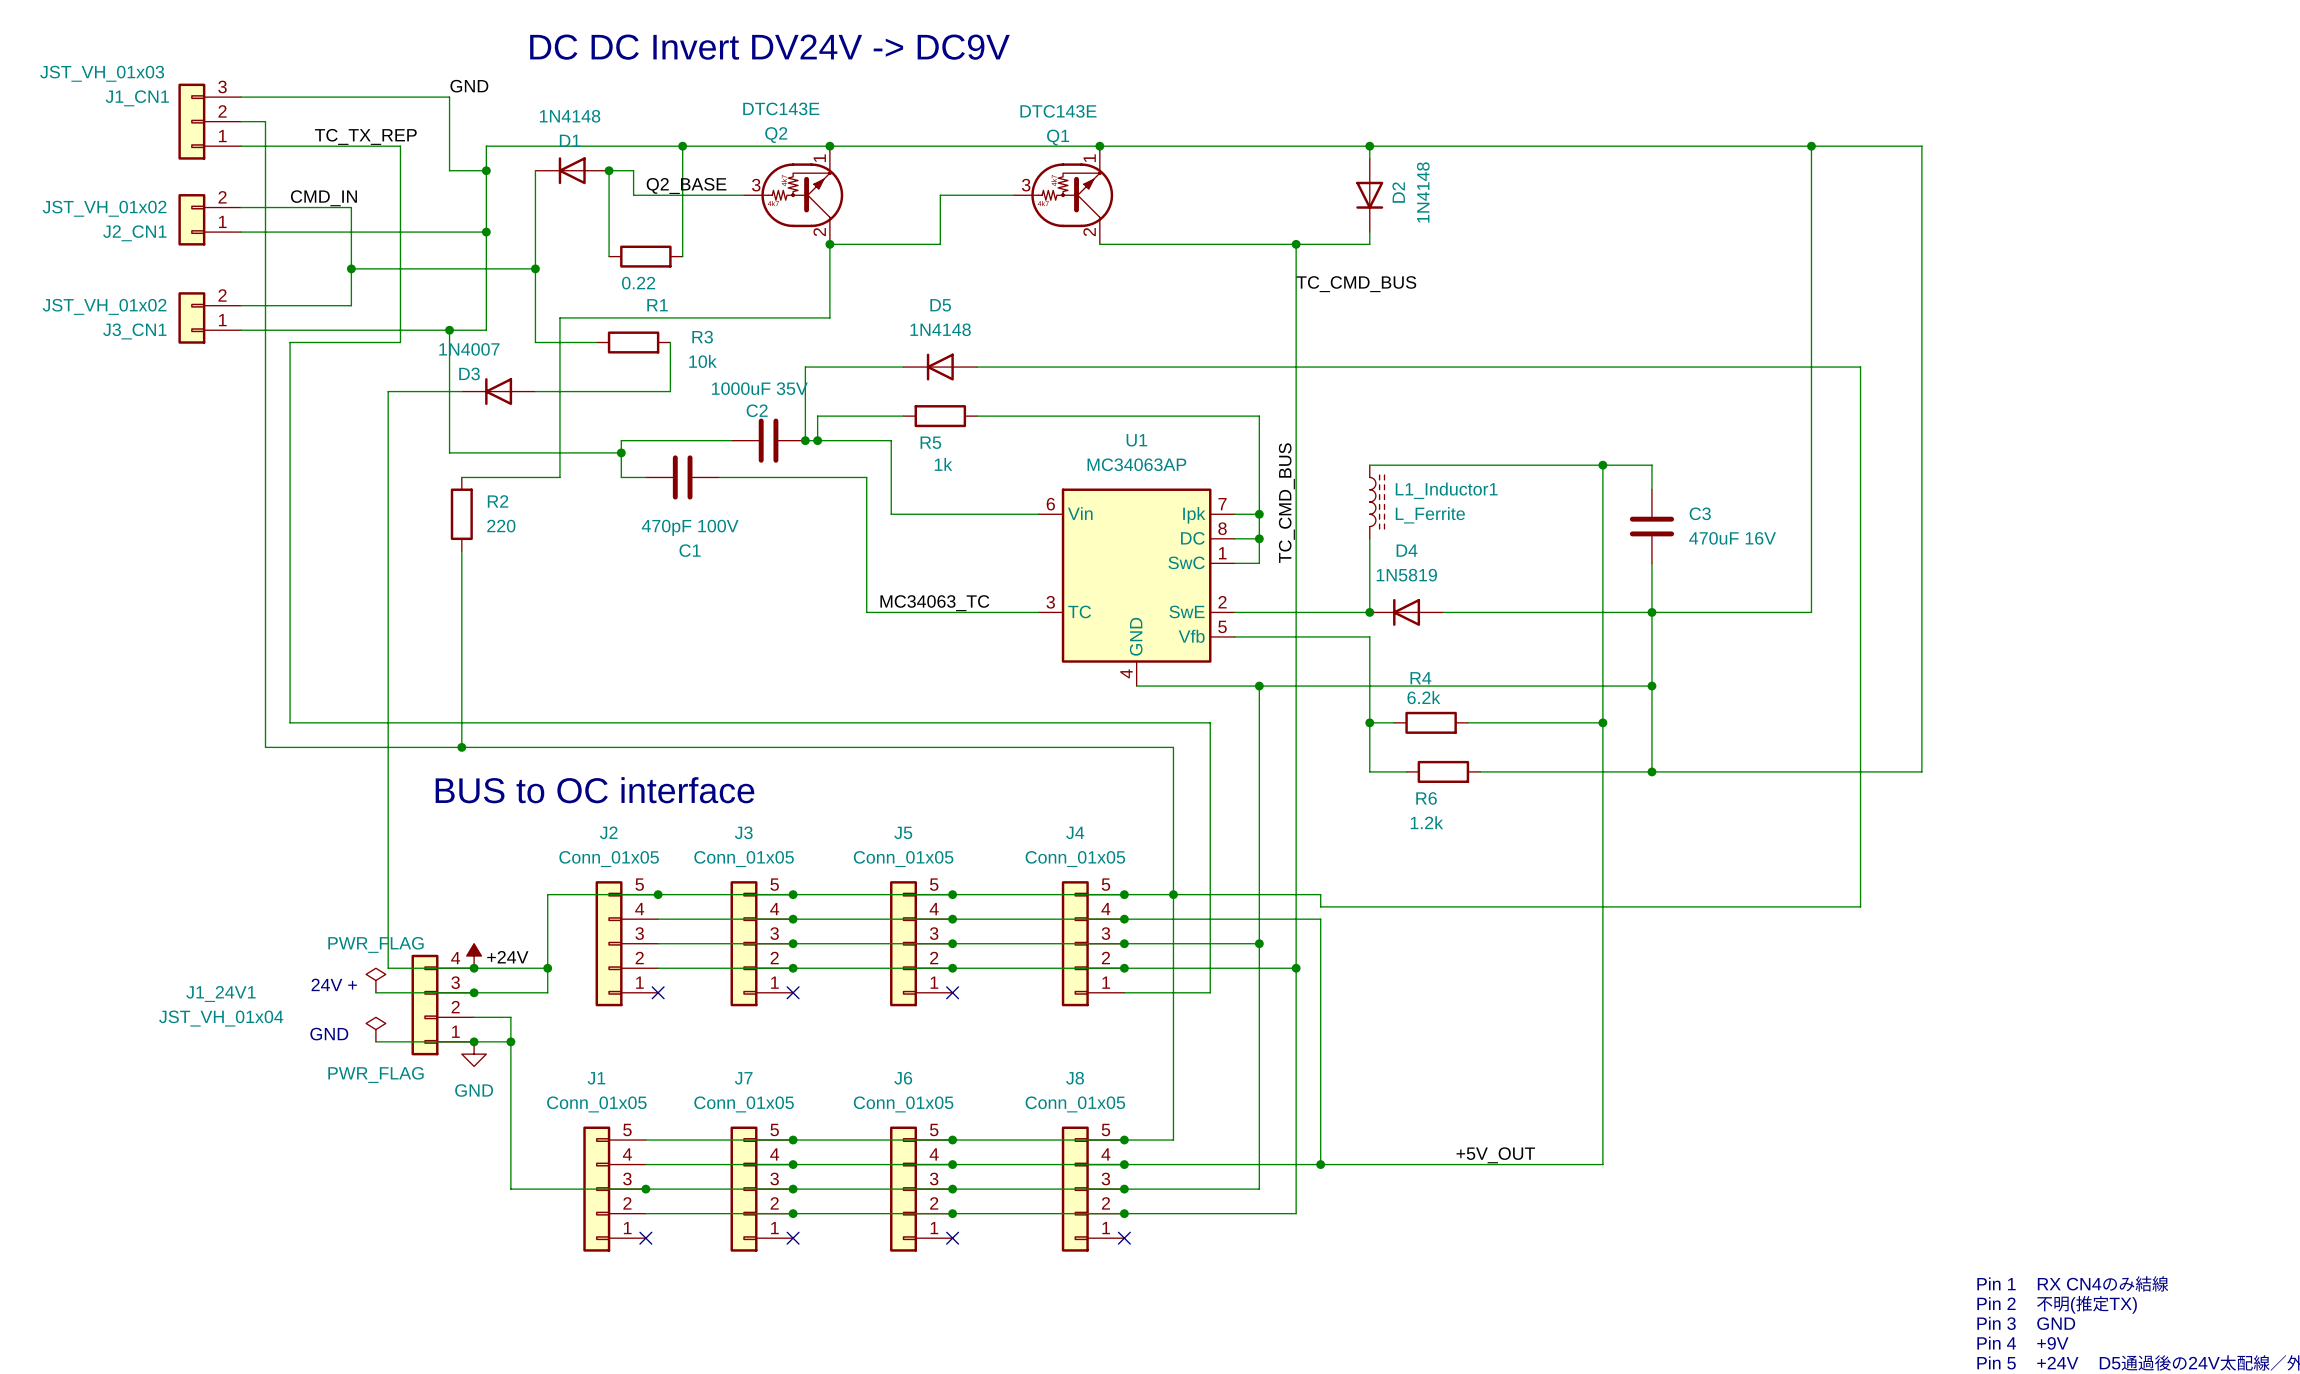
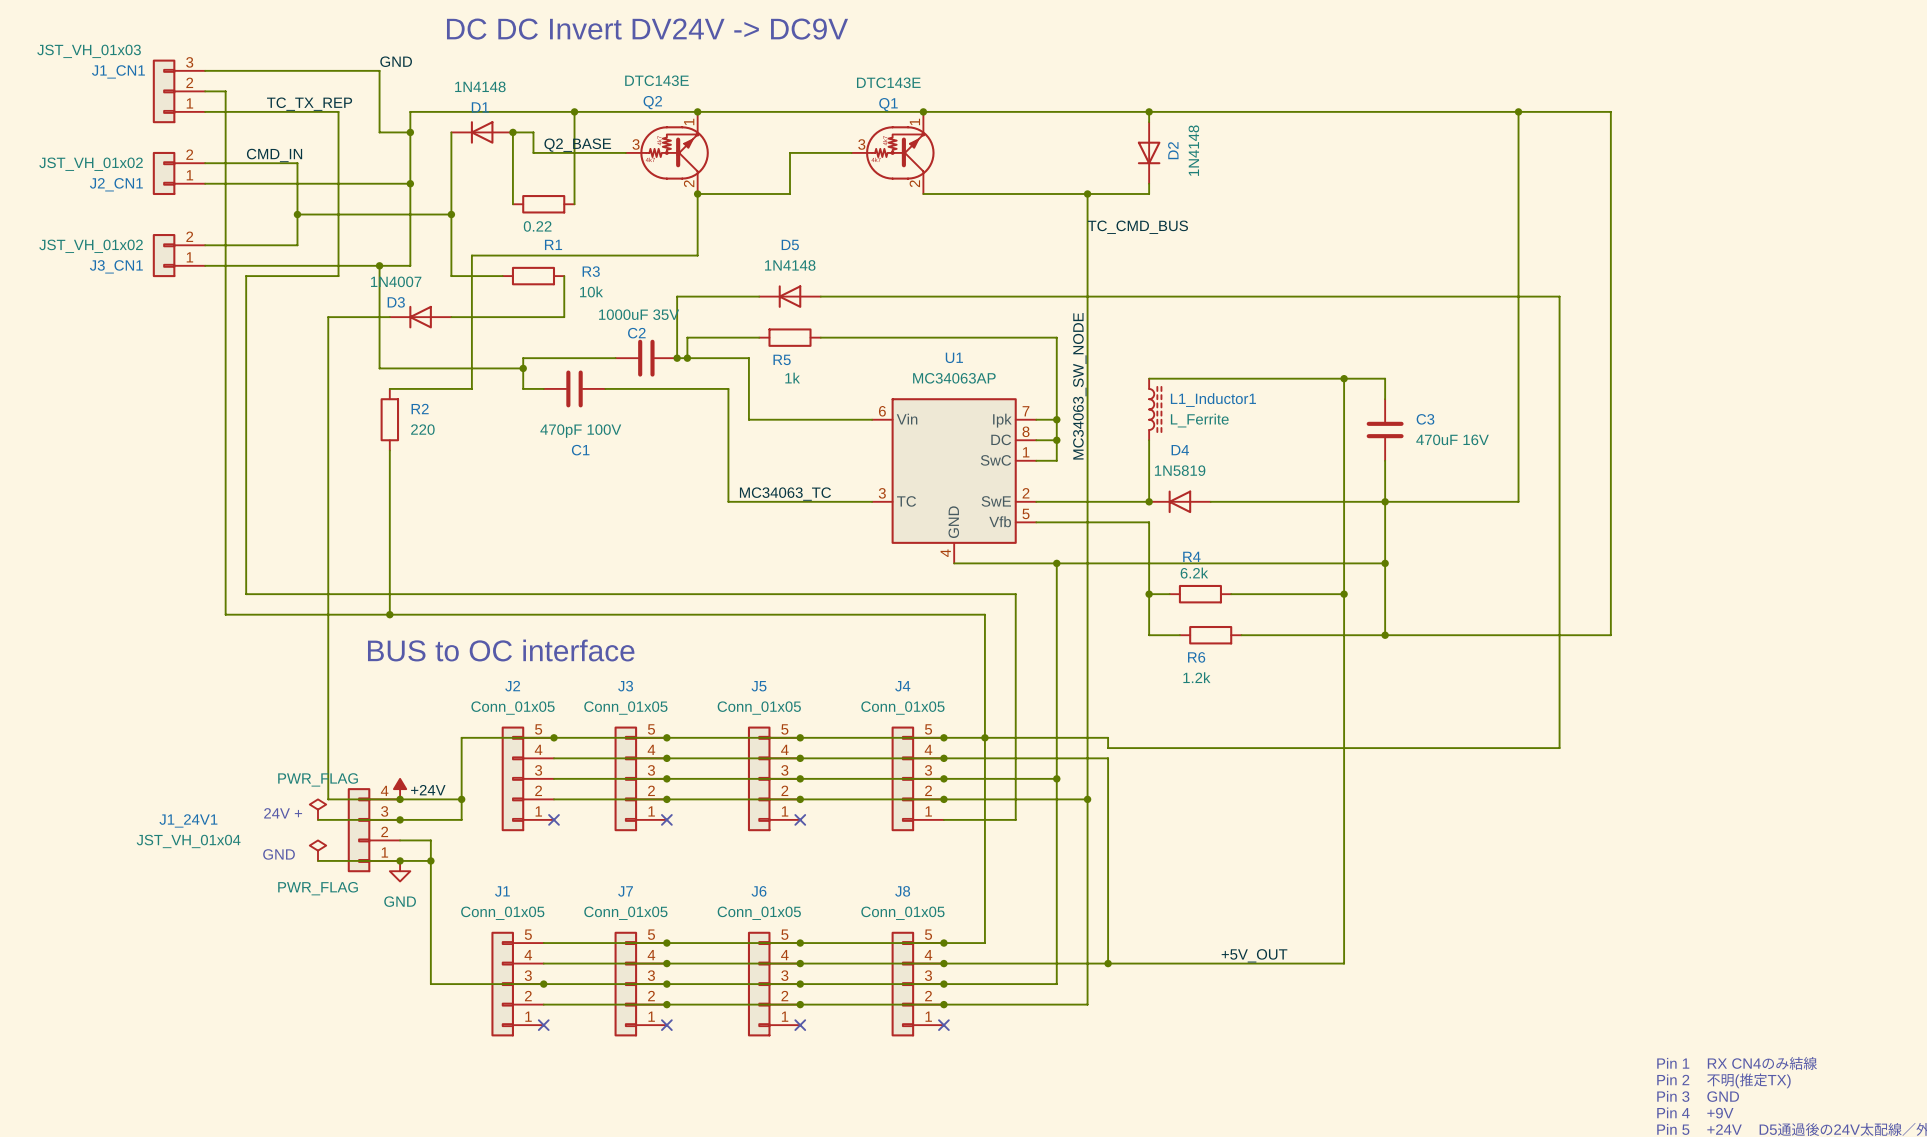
label: TC_CMD_BUS (1286, 503) -> MC34063_SW_NODE (1079, 386)

